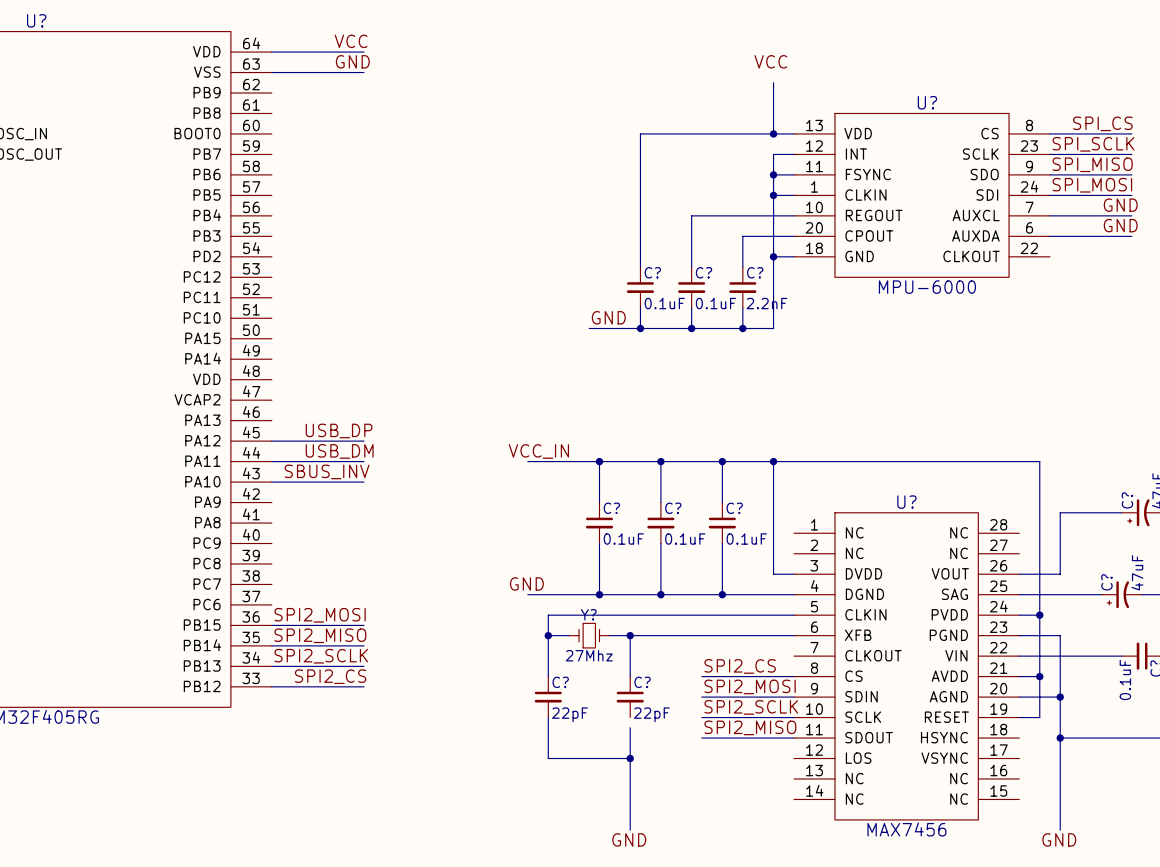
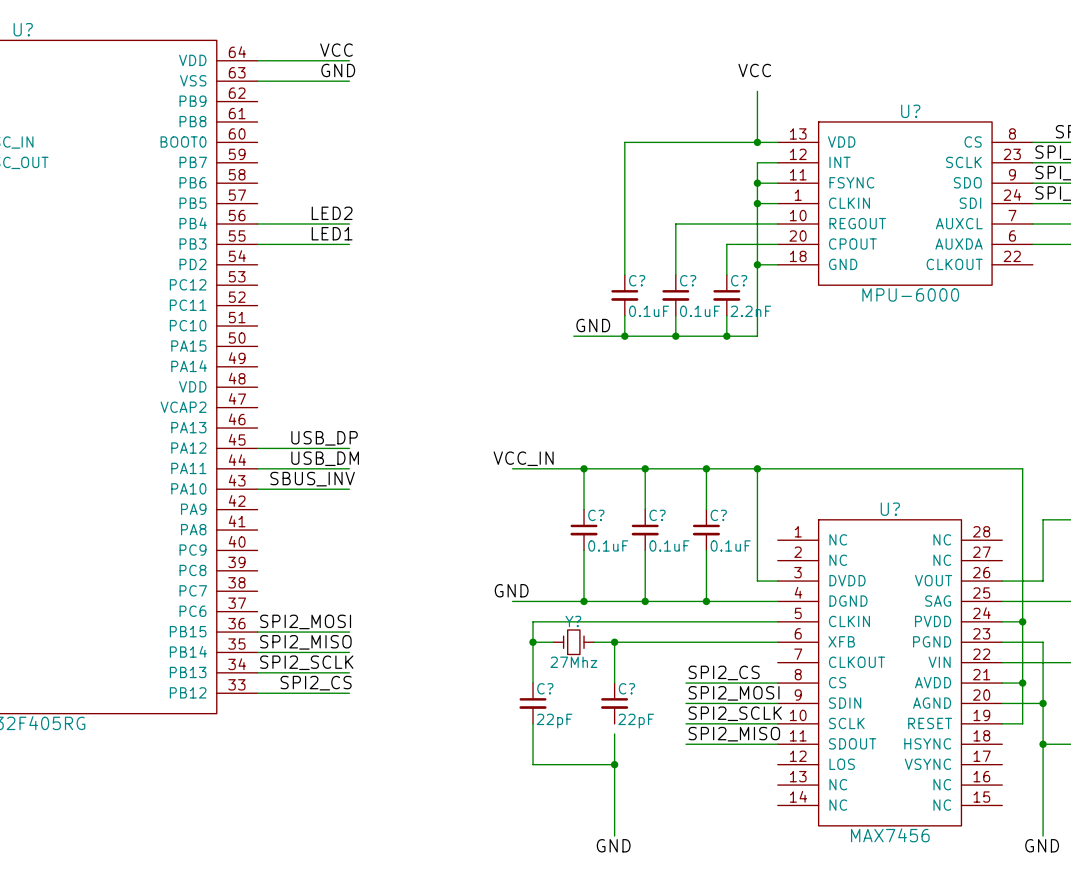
label: none -> LED2 (332, 213)
wire: none -> (257, 223) (349, 223)
label: none -> LED1 (332, 233)
wire: none -> (257, 244) (349, 244)

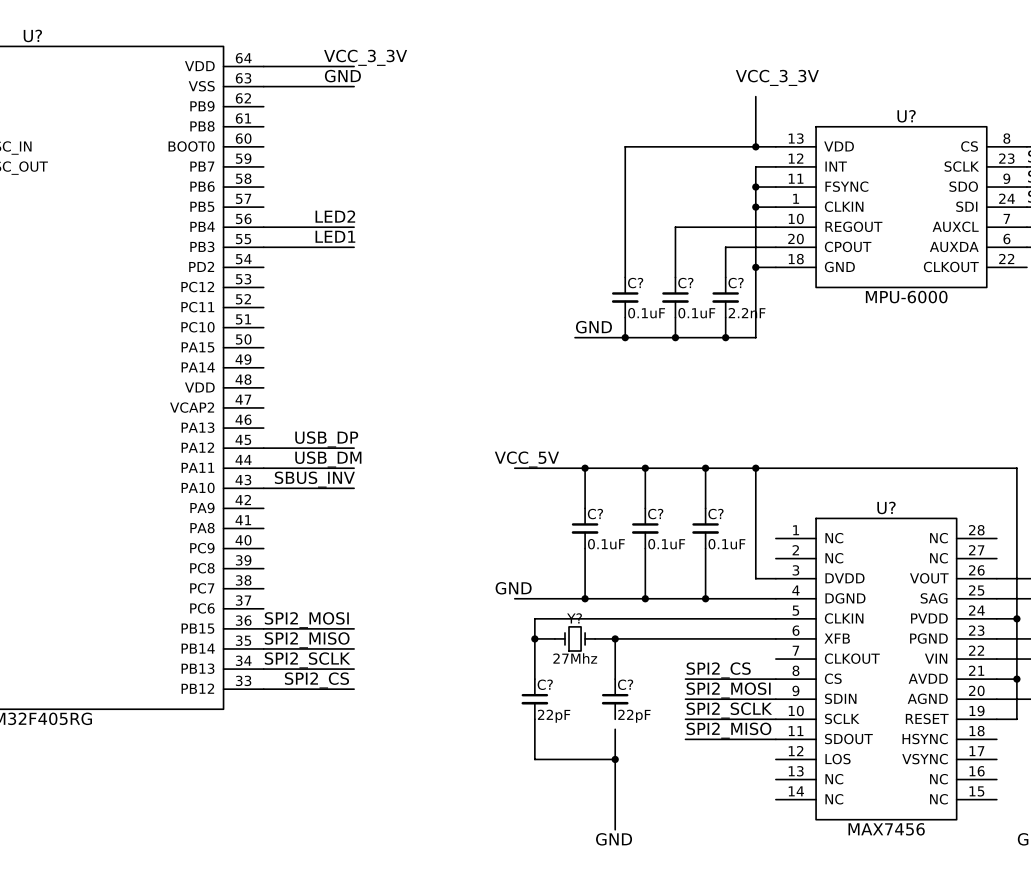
label: VCC (336, 50) -> VCC_3_3V (365, 57)
label: VCC (754, 70) -> VCC_3_3V (777, 77)
label: VCC_IN (523, 458) -> VCC_5V (526, 459)

